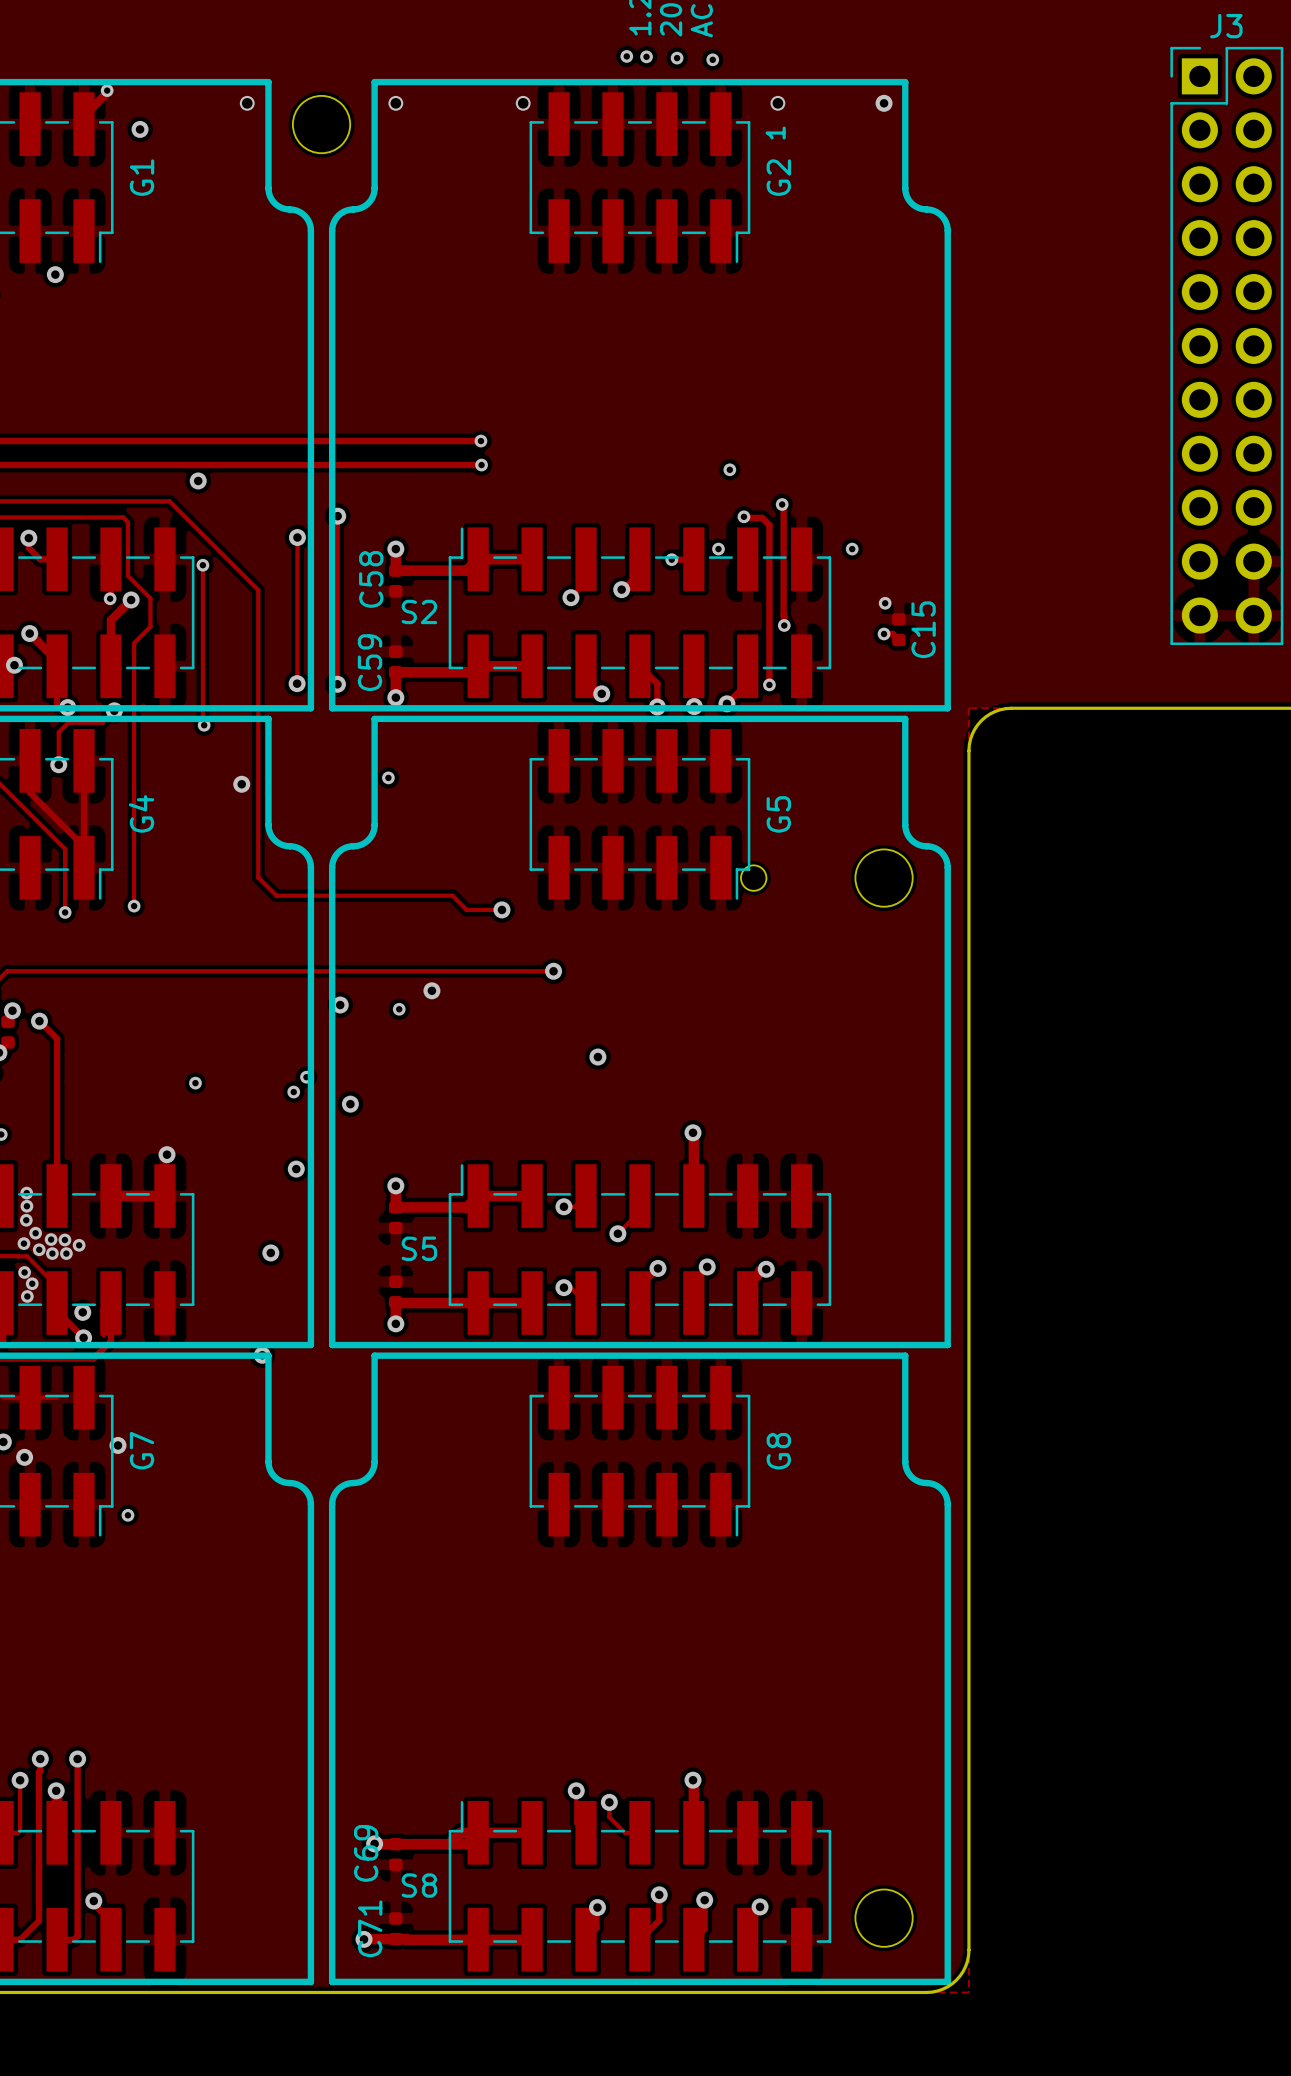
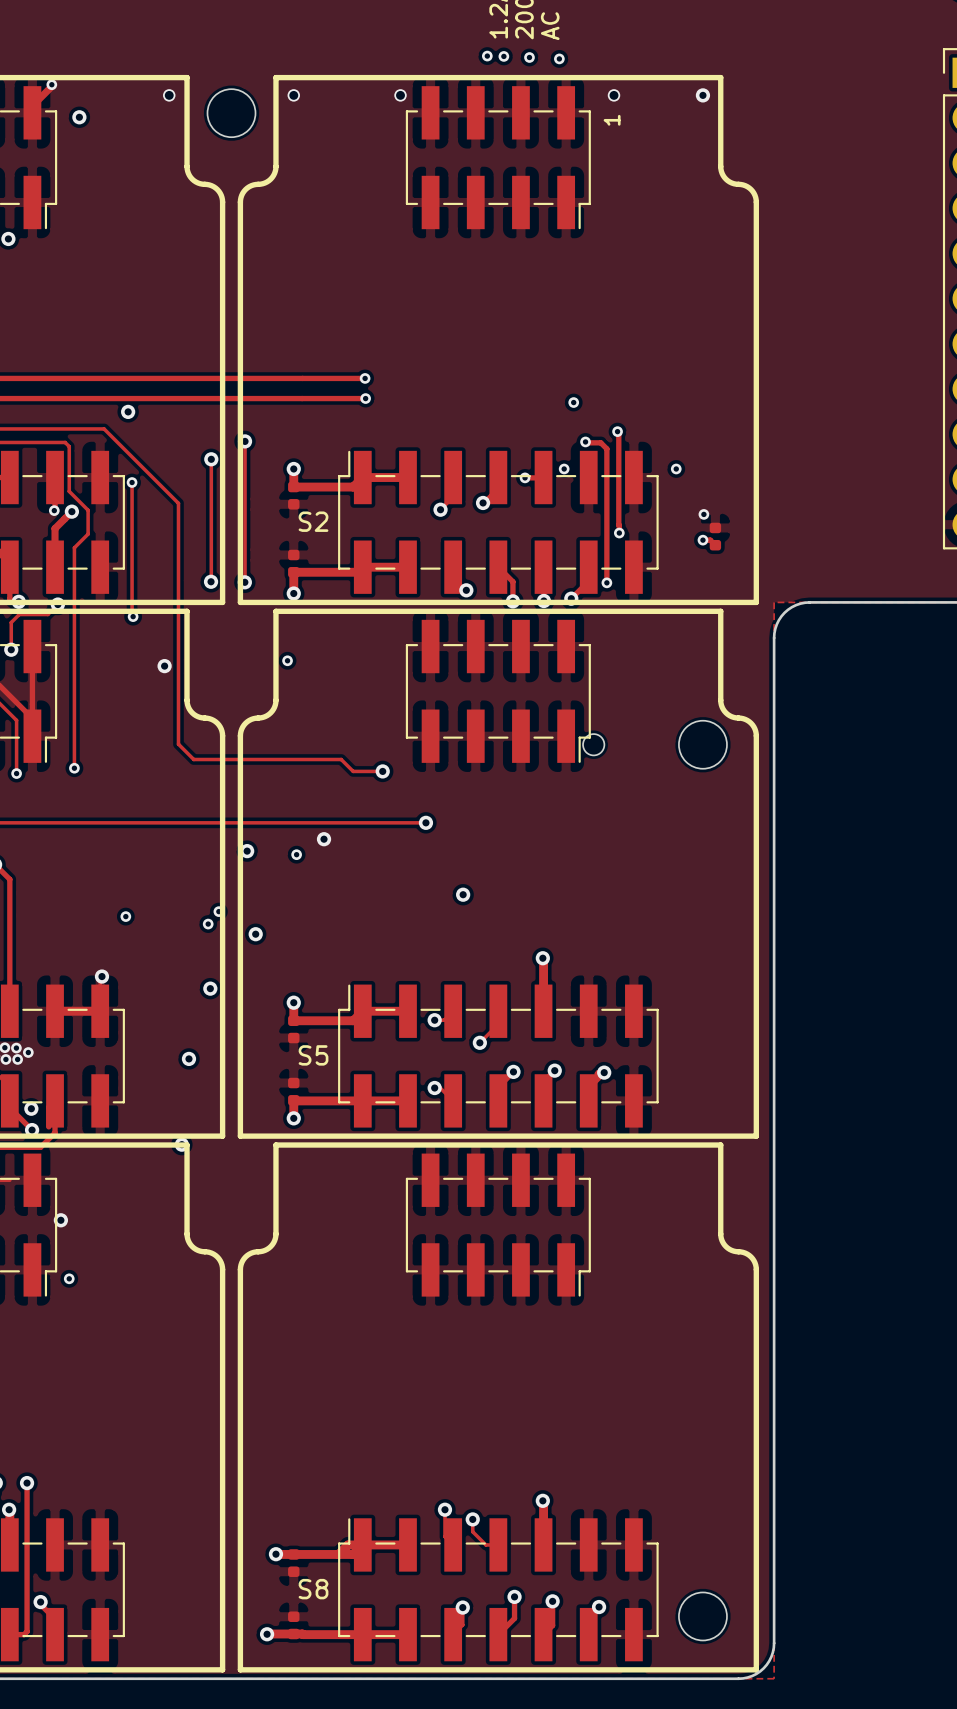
G1 name: G1 (142, 177) -> none
G2 name: G2 (778, 177) -> none
C58 name: C58 (371, 579) -> none
C15 name: C15 (923, 629) -> none
C59 name: C59 (370, 662) -> none
G4 name: G4 (141, 813) -> none
G5 name: G5 (778, 814) -> none
G7 name: G7 (142, 1450) -> none
G8 name: G8 (778, 1451) -> none
C69 name: C69 (366, 1853) -> none
C71 name: C71 (370, 1928) -> none

